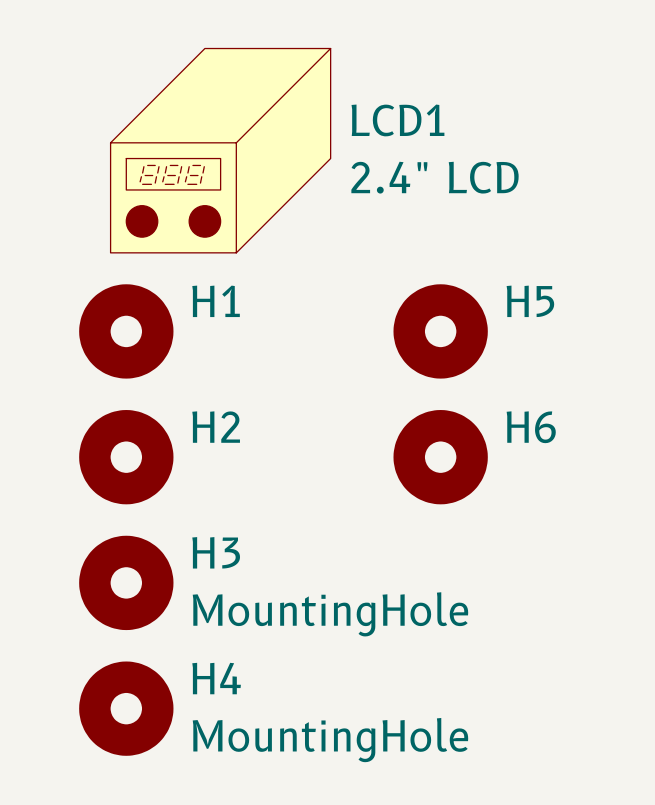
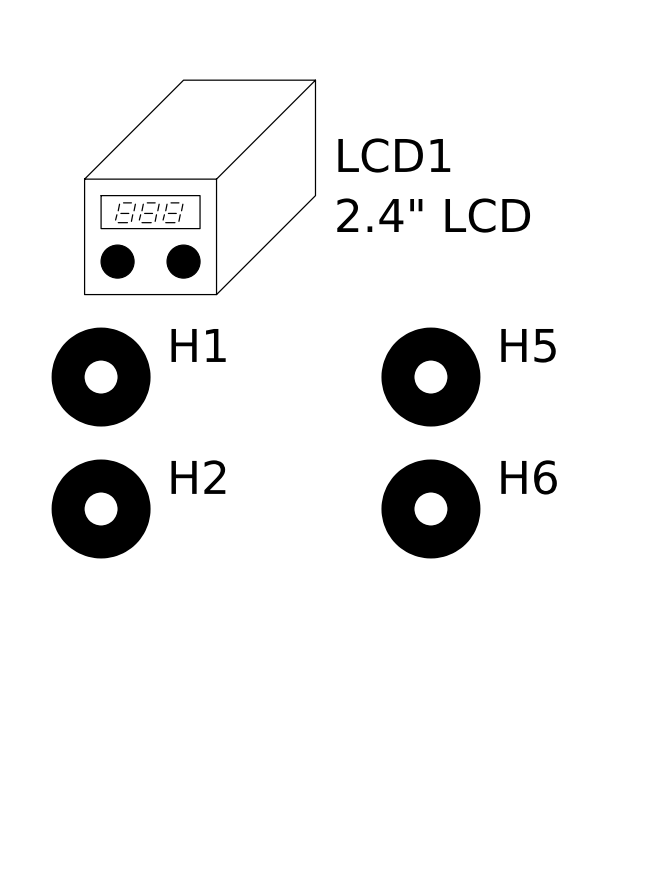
H3: MountingHole (126, 582) -> none
H4: MountingHole (126, 708) -> none

